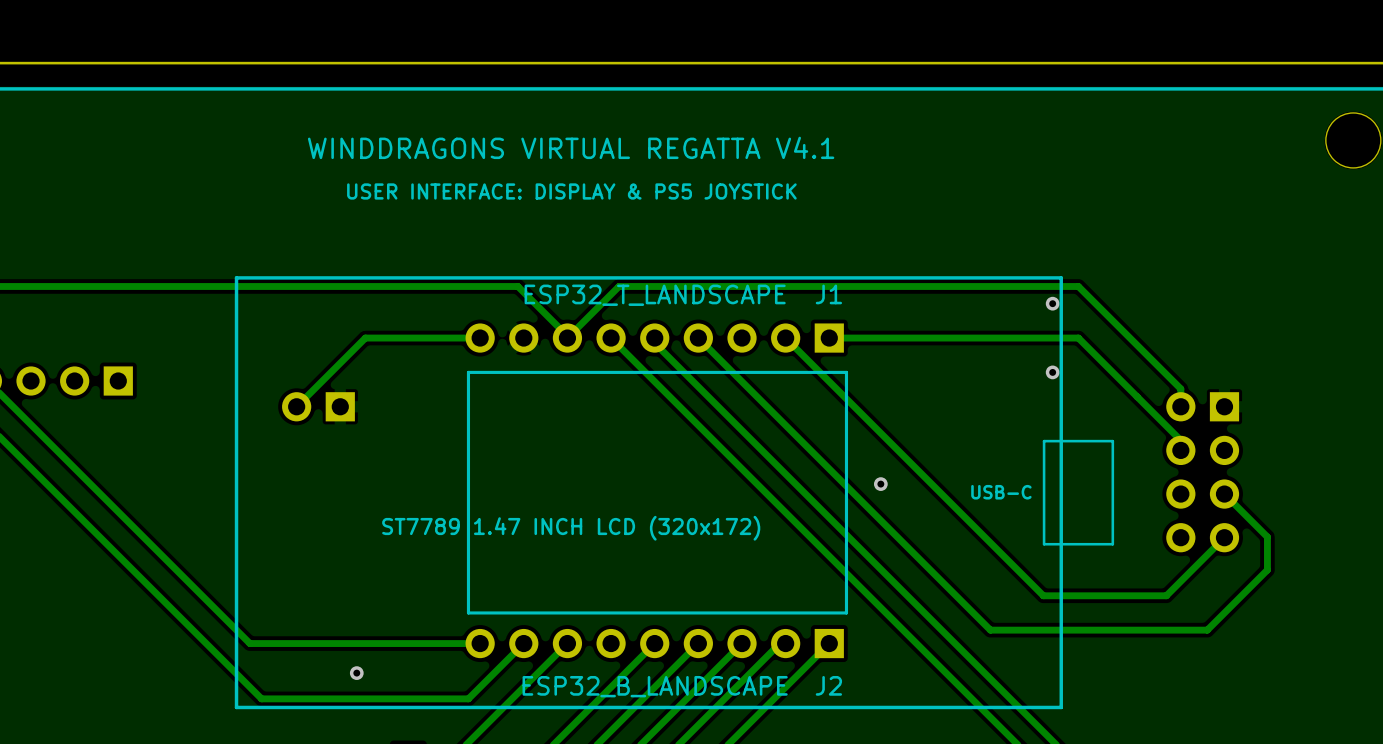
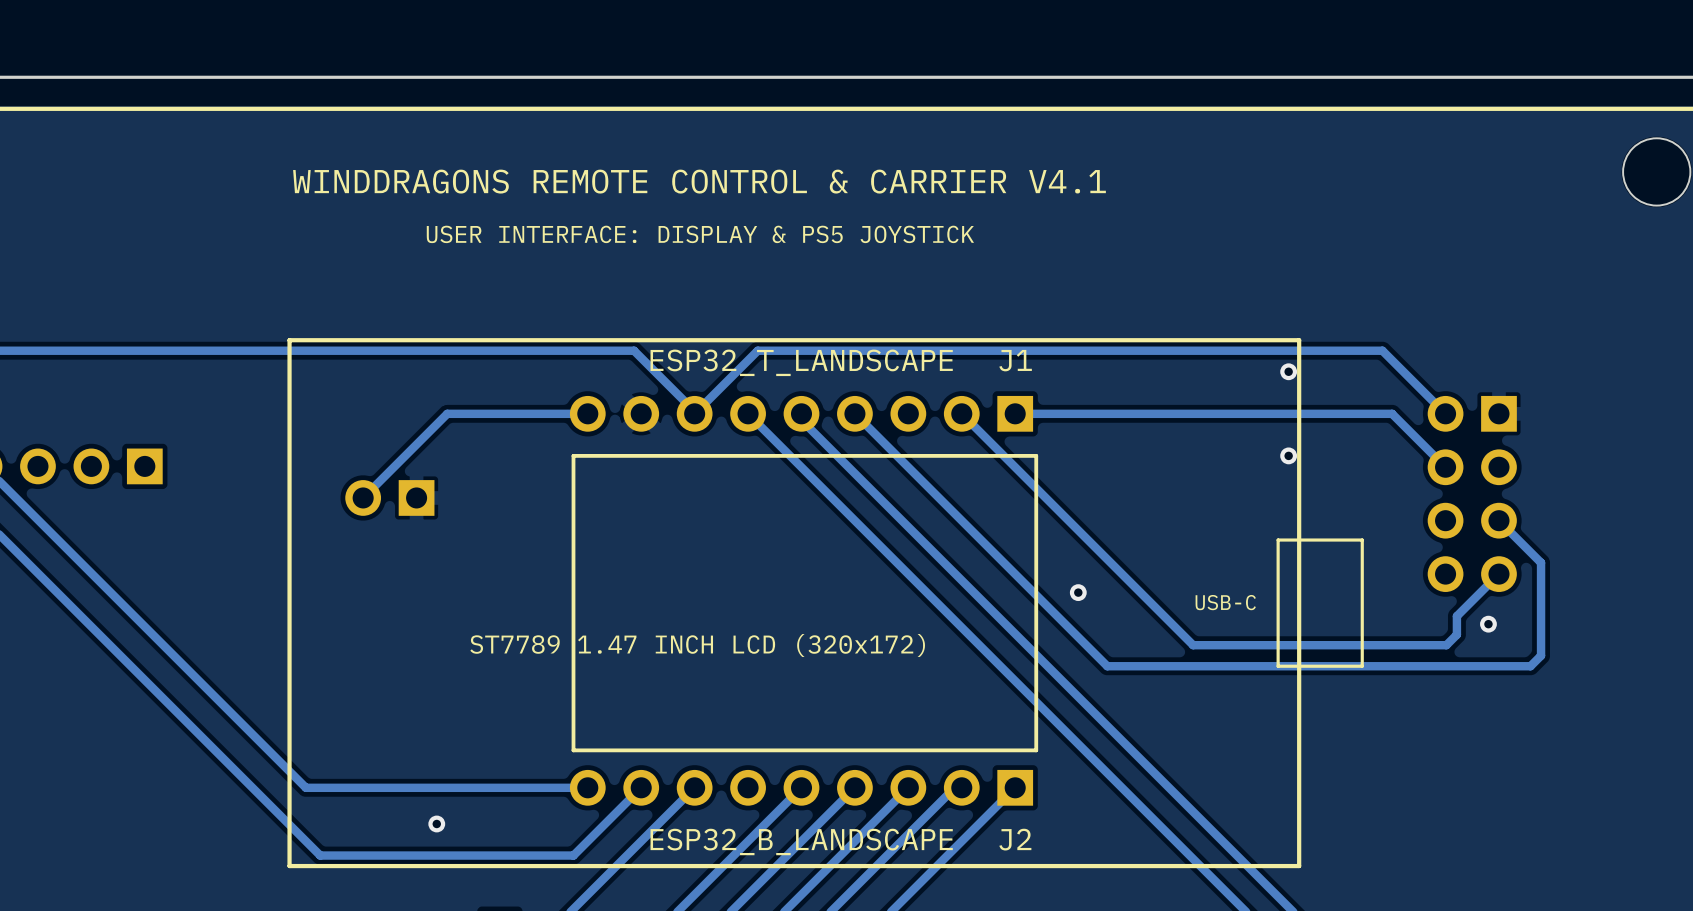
text: WINDDRAGONS VIRTUAL REGATTA V4.1 (571, 147) -> WINDDRAGONS REMOTE CONTROL & CARRIER V4.1 (699, 181)
track: (1078, 286) (1180, 388) (1180, 396) -> (1320, 350) (1382, 350) (1445, 413)
track: (1078, 338) (1180, 440) -> (1320, 413) (1392, 413) (1445, 467)
part position: (1202, 472) -> (1472, 493)
track: (1224, 484) (1224, 494) (1267, 537) (1267, 570) (1207, 630) (990, 630) (904, 544) -> (1498, 520) (1541, 562) (1541, 655) (1530, 666) (1107, 666)
via: none -> (1488, 624)
track: (974, 527) (1043, 595) (1166, 595) (1224, 537) (1224, 527) -> (1193, 645) (1446, 645) (1456, 634) (1456, 616) (1498, 574)

